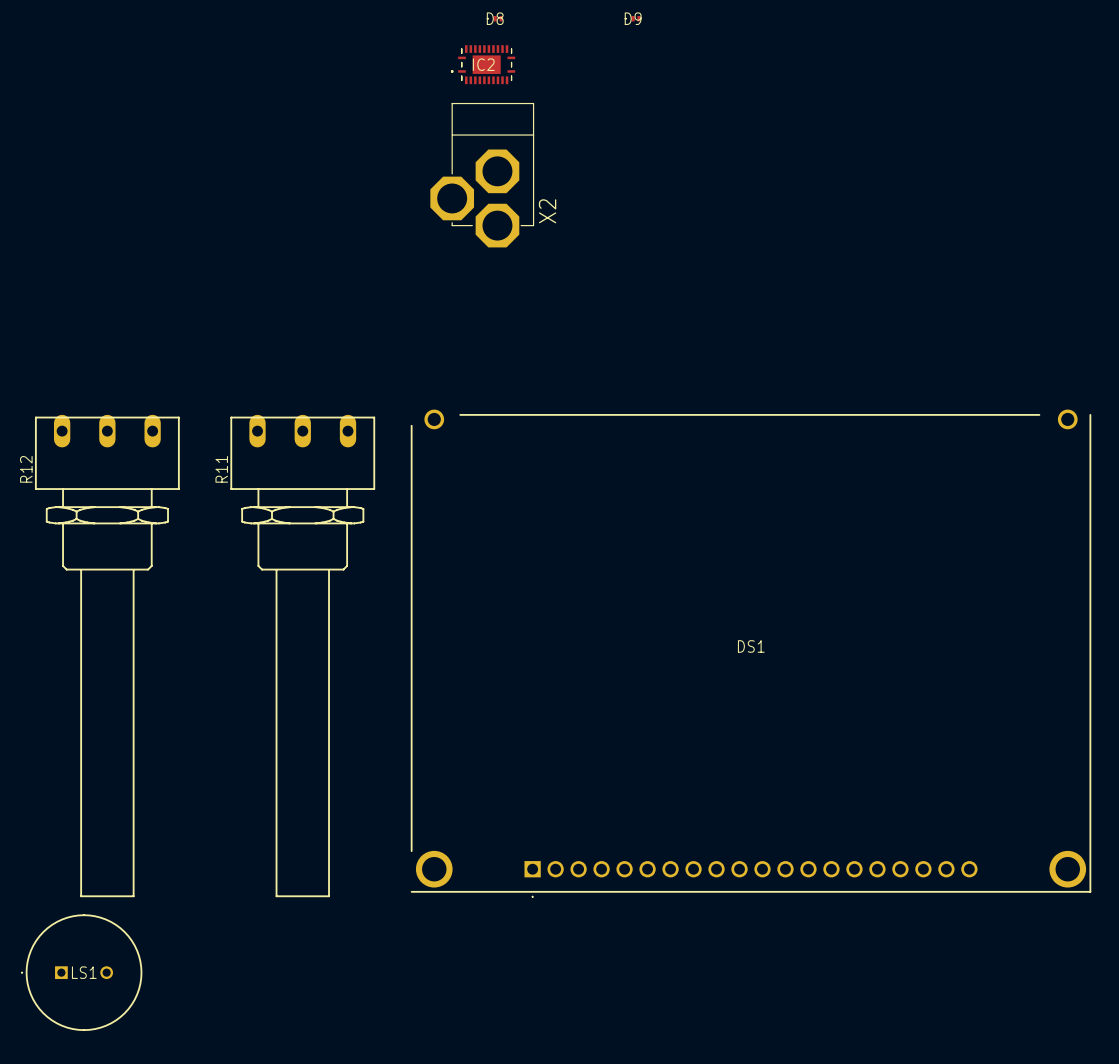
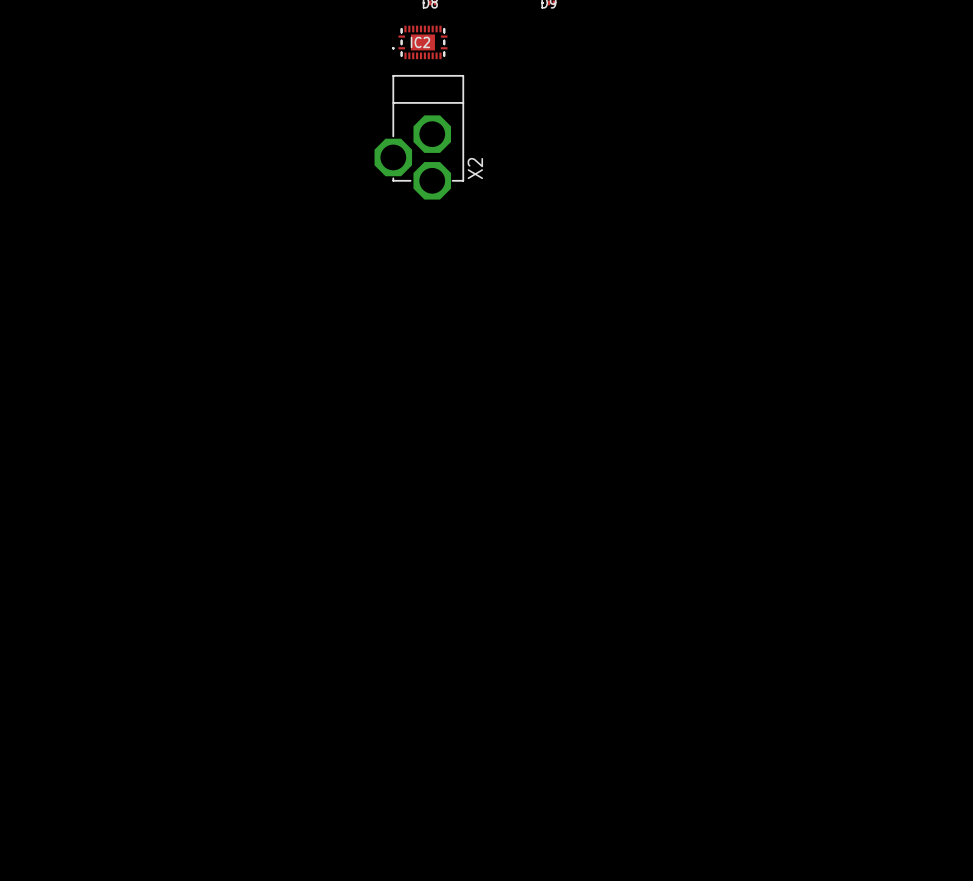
DS1: (751, 653) -> none
R12: (107, 656) -> none
R11: (302, 656) -> none
LS1: (81, 972) -> none

